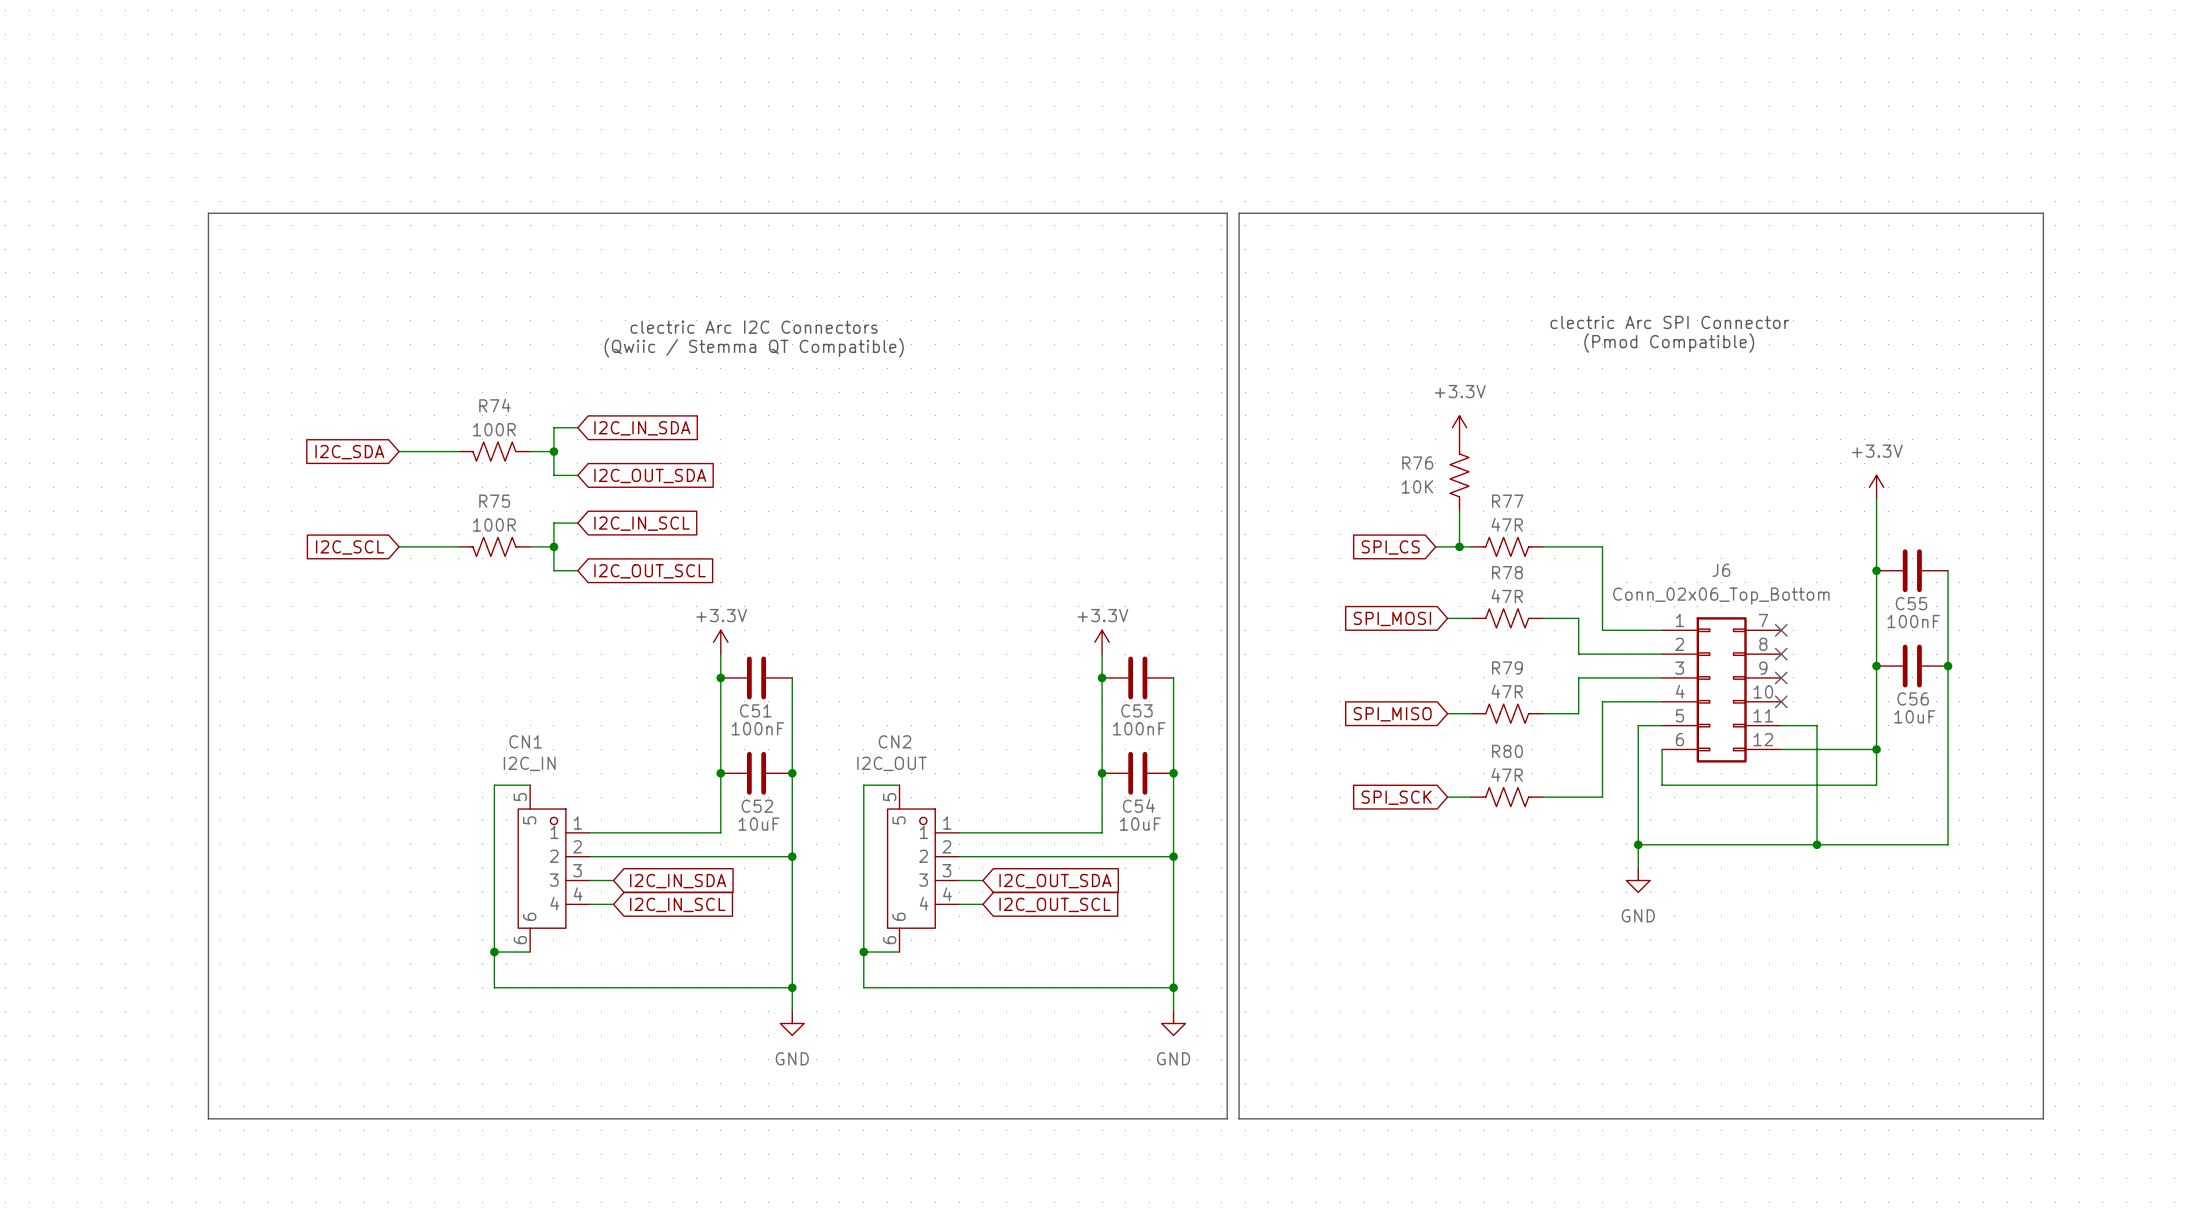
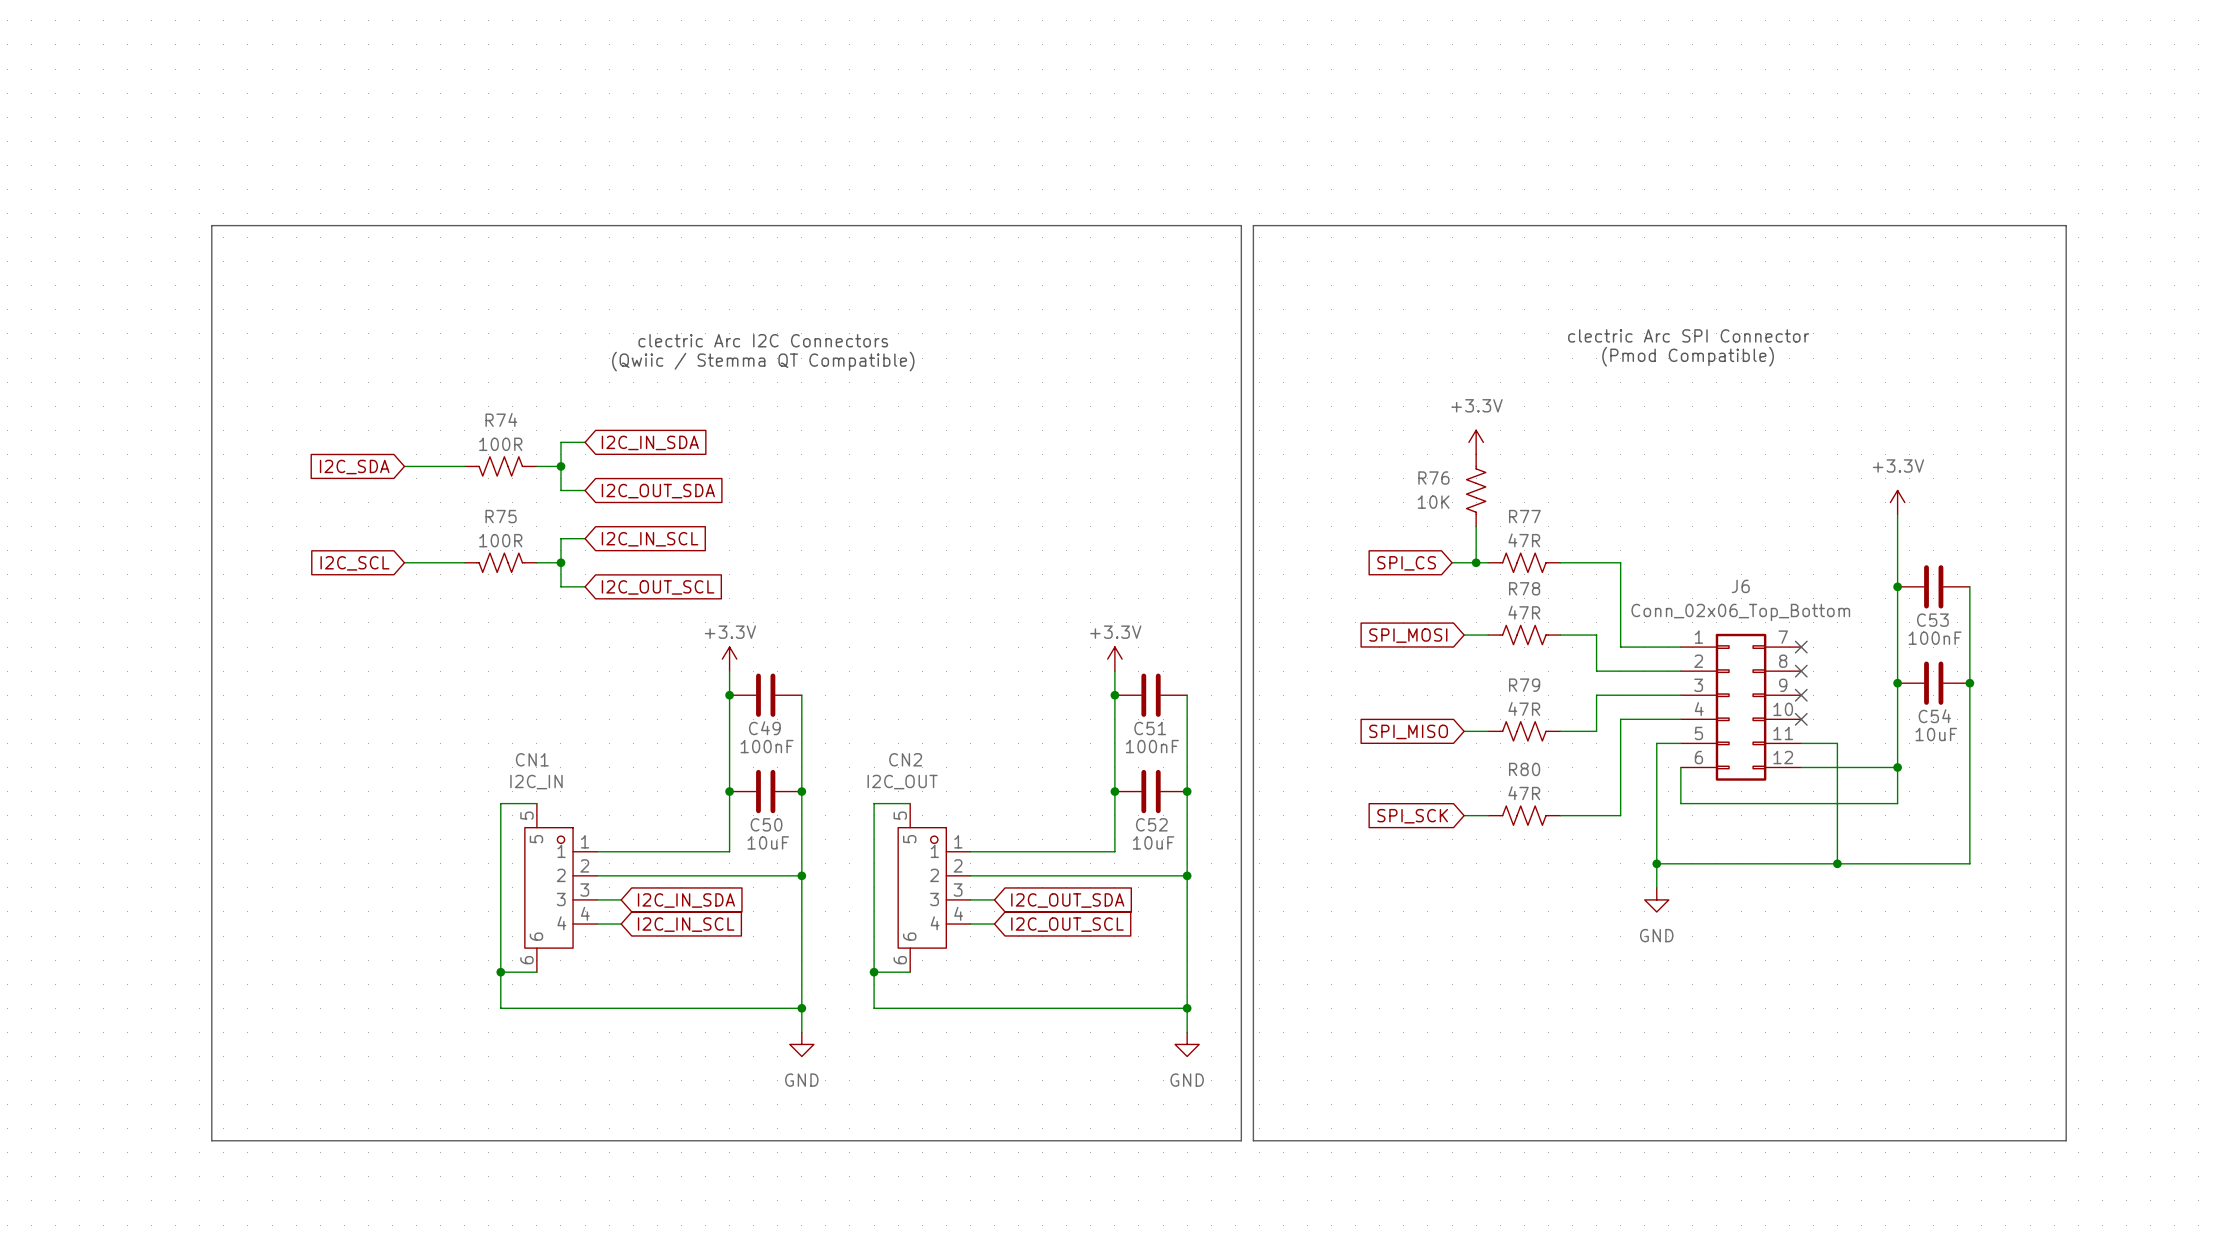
C55 name: C55 (1911, 603) -> C53 (1932, 620)
C56 name: C56 (1913, 698) -> C54 (1934, 716)
C51 name: C51 (755, 710) -> C49 (764, 728)
C53 name: C53 (1136, 710) -> C51 (1150, 728)
C54 name: C54 (1138, 805) -> C52 (1151, 824)
C52 name: C52 (757, 806) -> C50 (766, 824)

